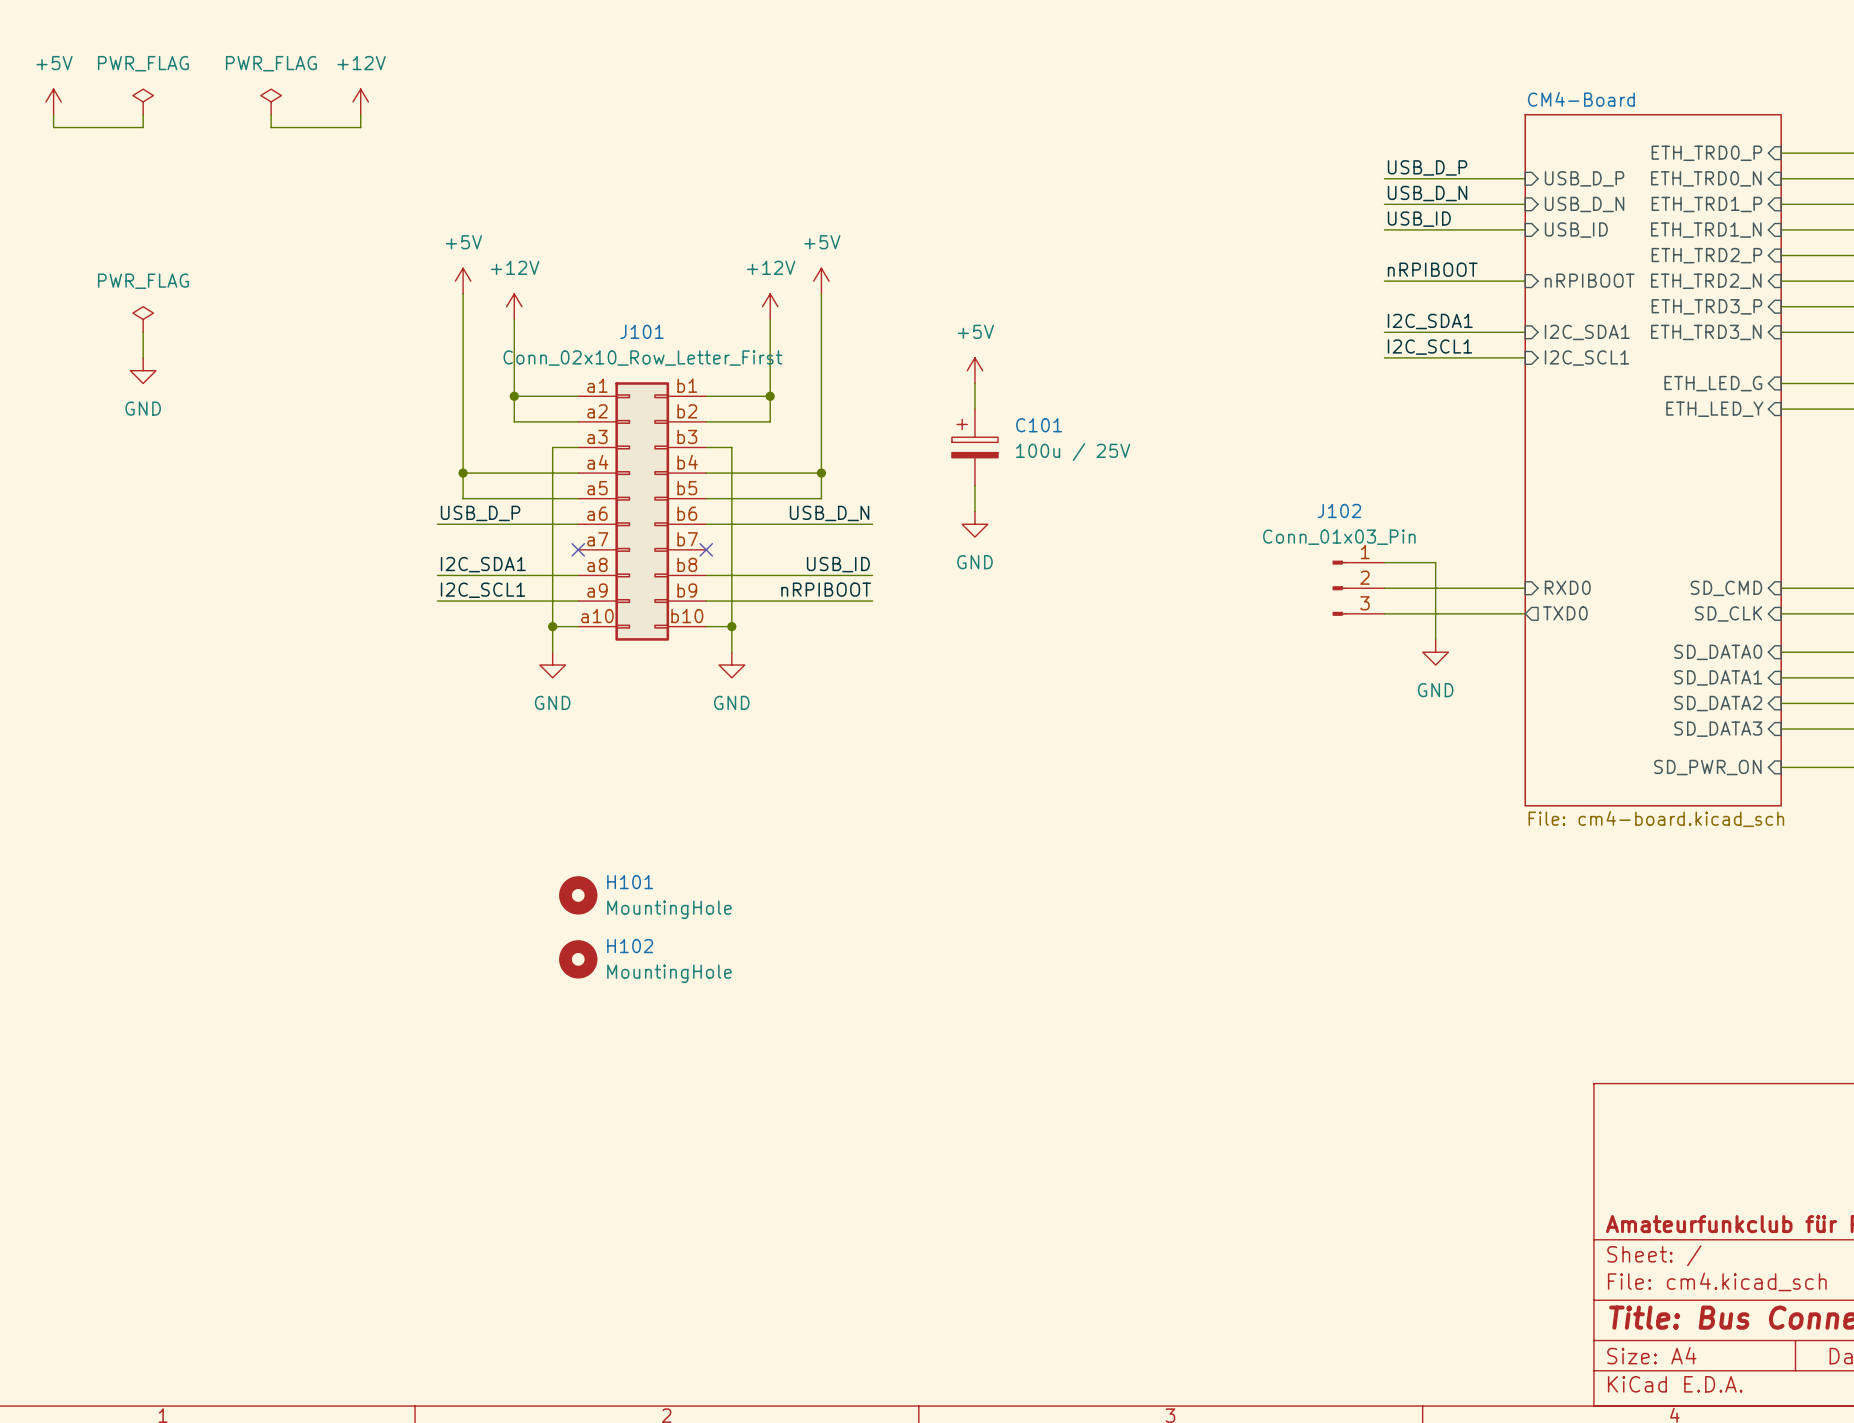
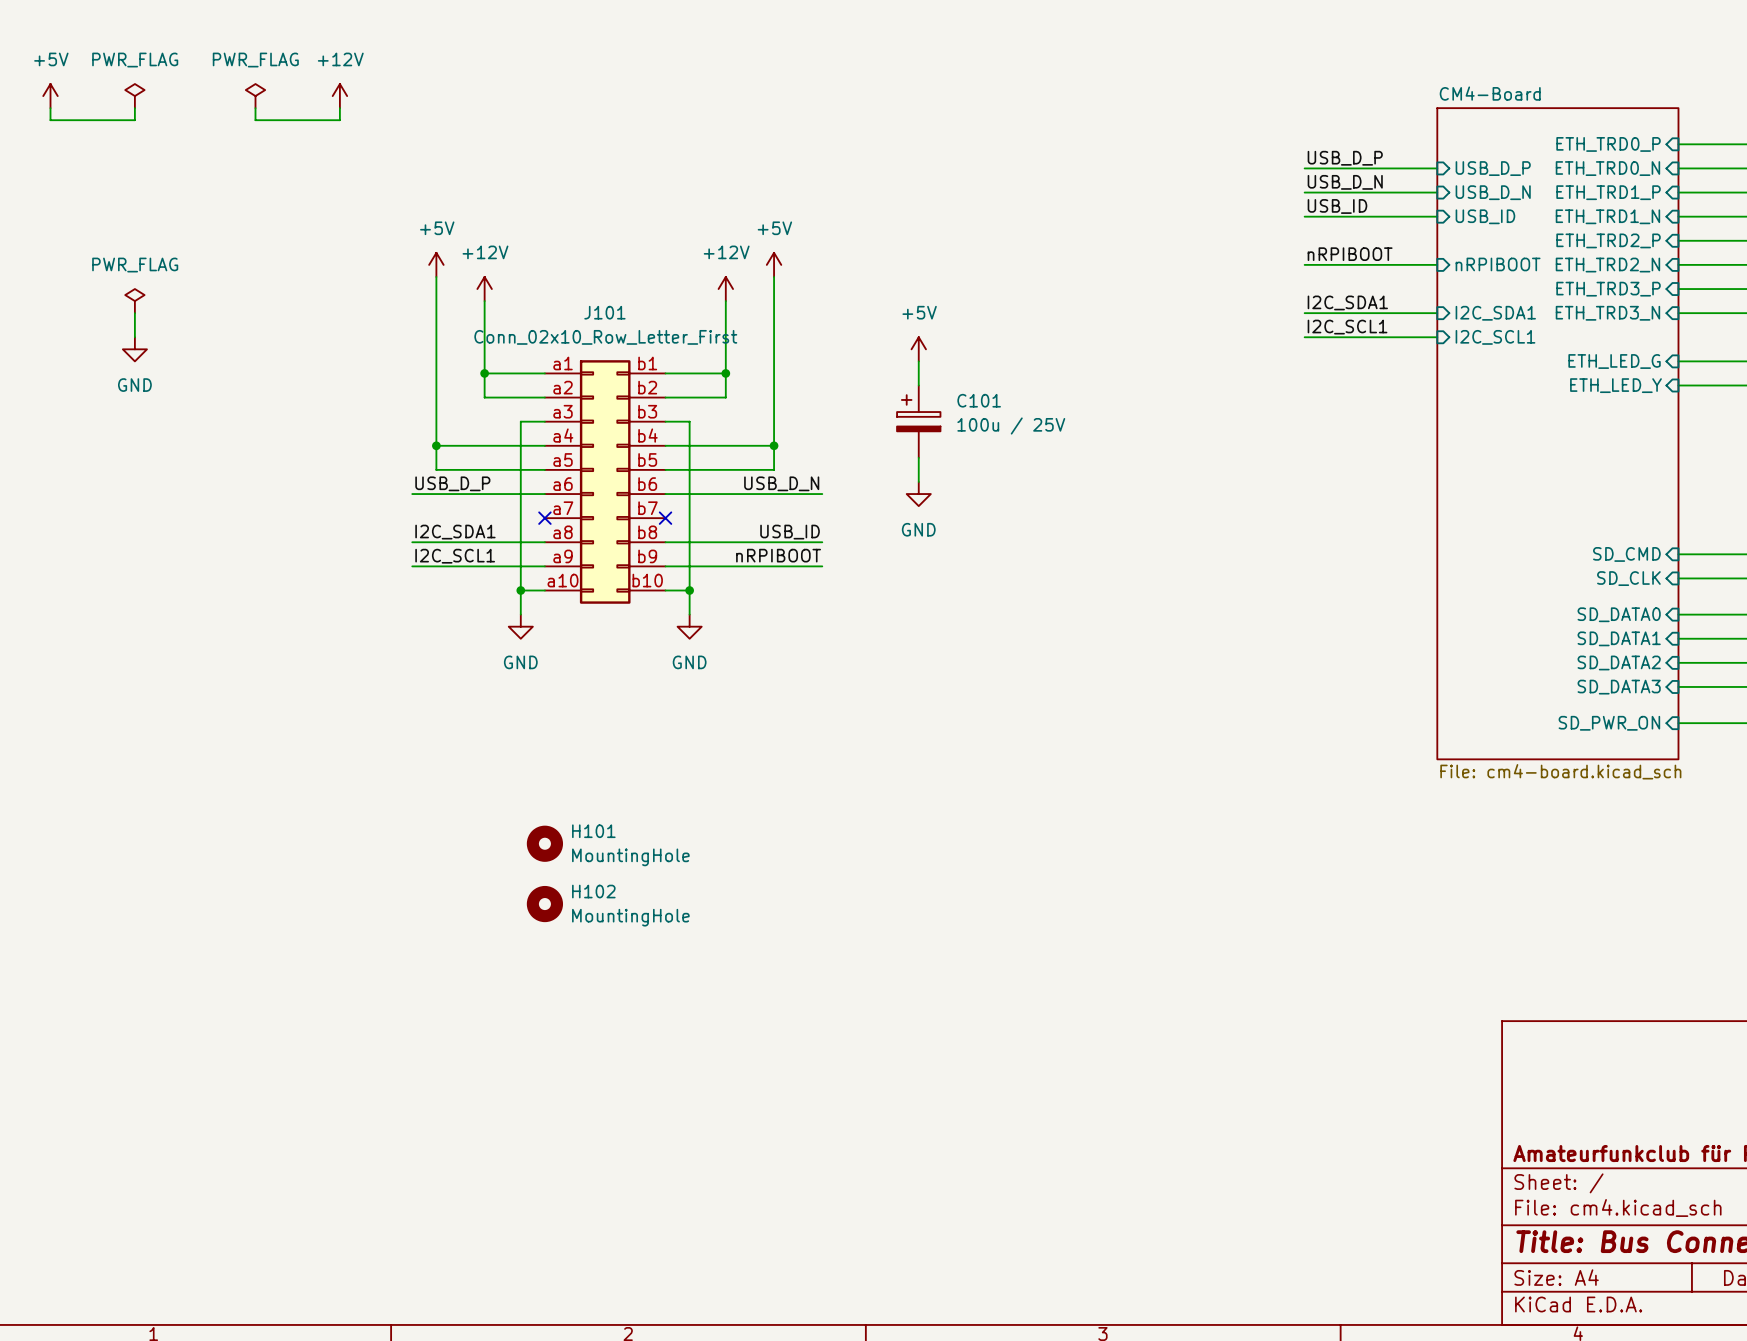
wire: (1384, 562) (1435, 562) (1435, 639) -> none
sheet pin: RXD0 (1567, 587) -> none
J102: Conn_01x03_Pin (1358, 588) -> none
wire: (1384, 588) (1525, 588) -> none
wire: (1384, 613) (1525, 613) -> none
sheet pin: TXD0 (1565, 613) -> none
power symbol: GND (1435, 652) -> none

